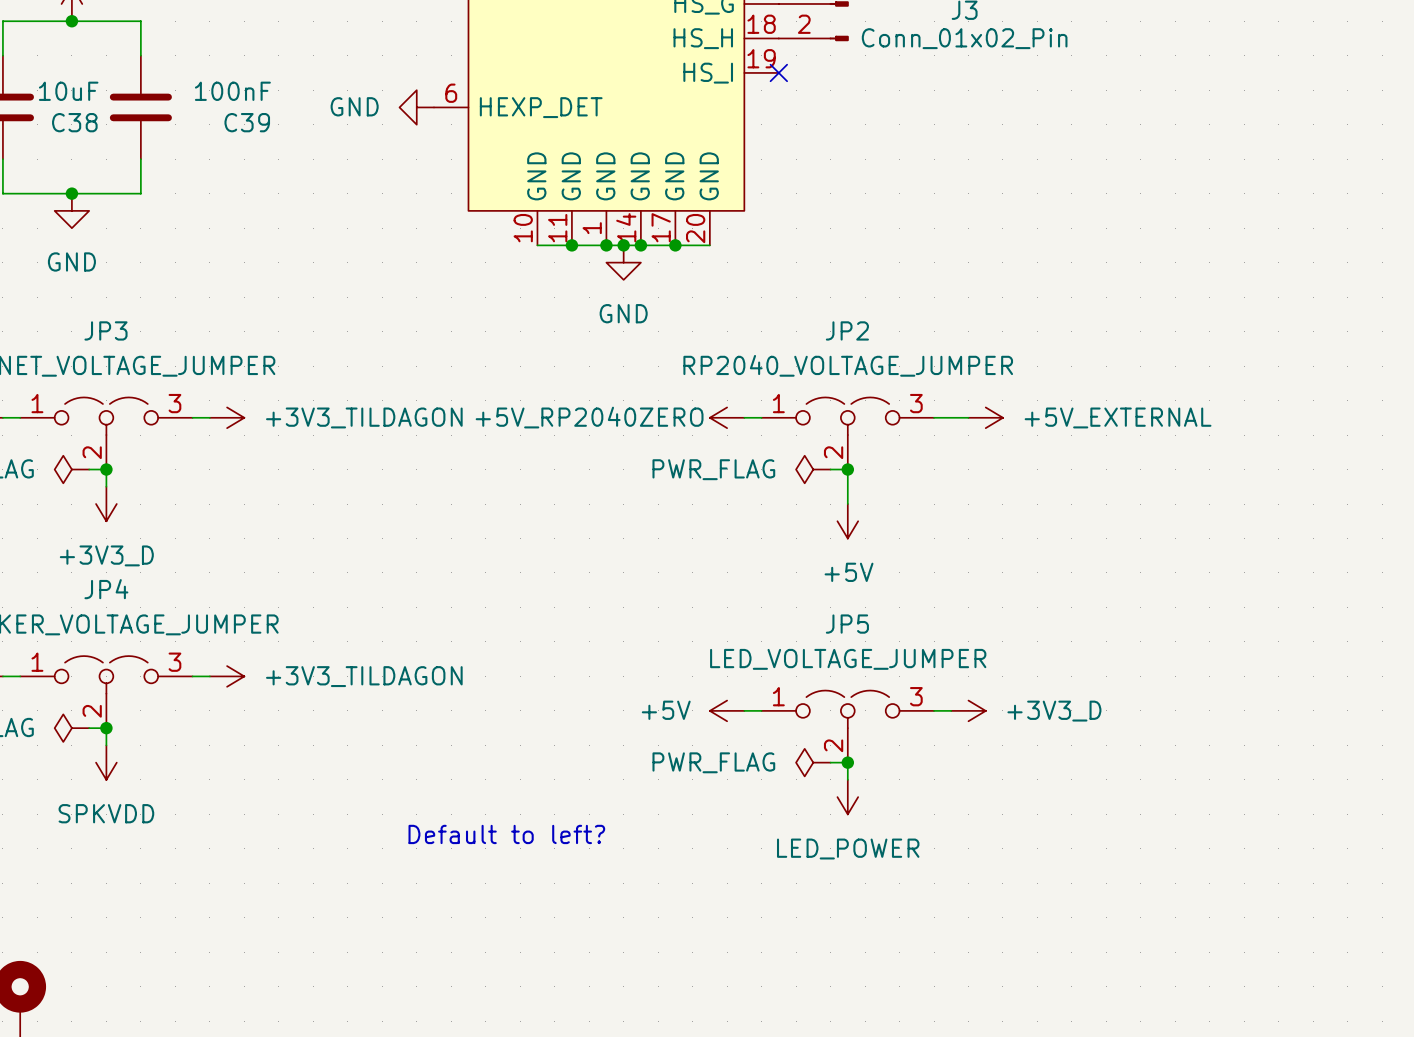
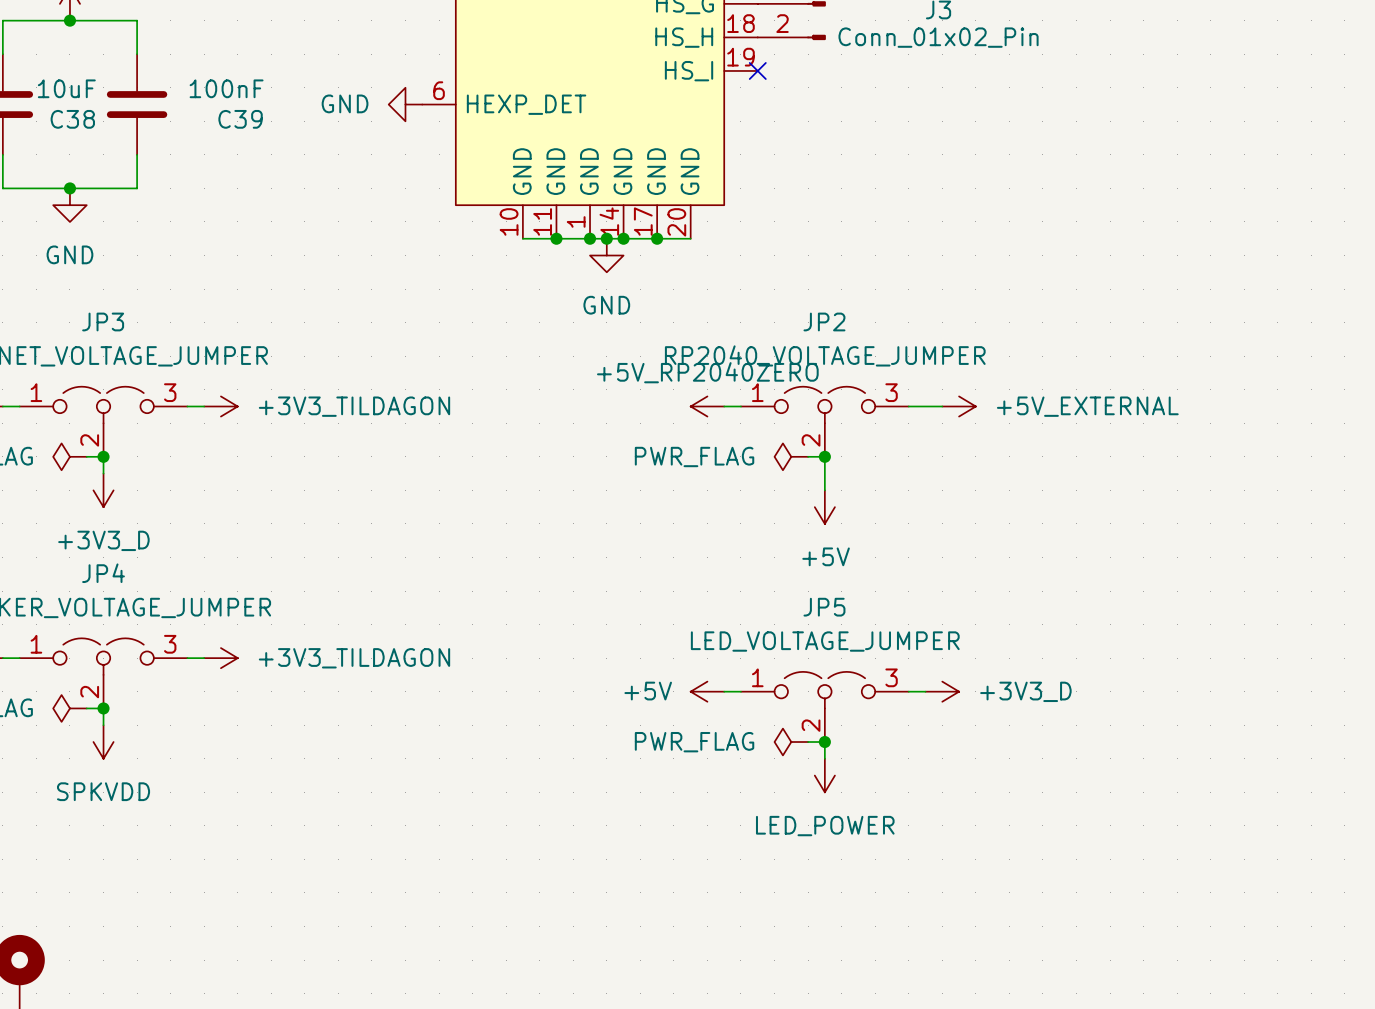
power symbol text position: +5V_RP2040ZERO (589, 417) -> +5V_RP2040ZERO (707, 372)
text: Default to left? (506, 834) -> none

